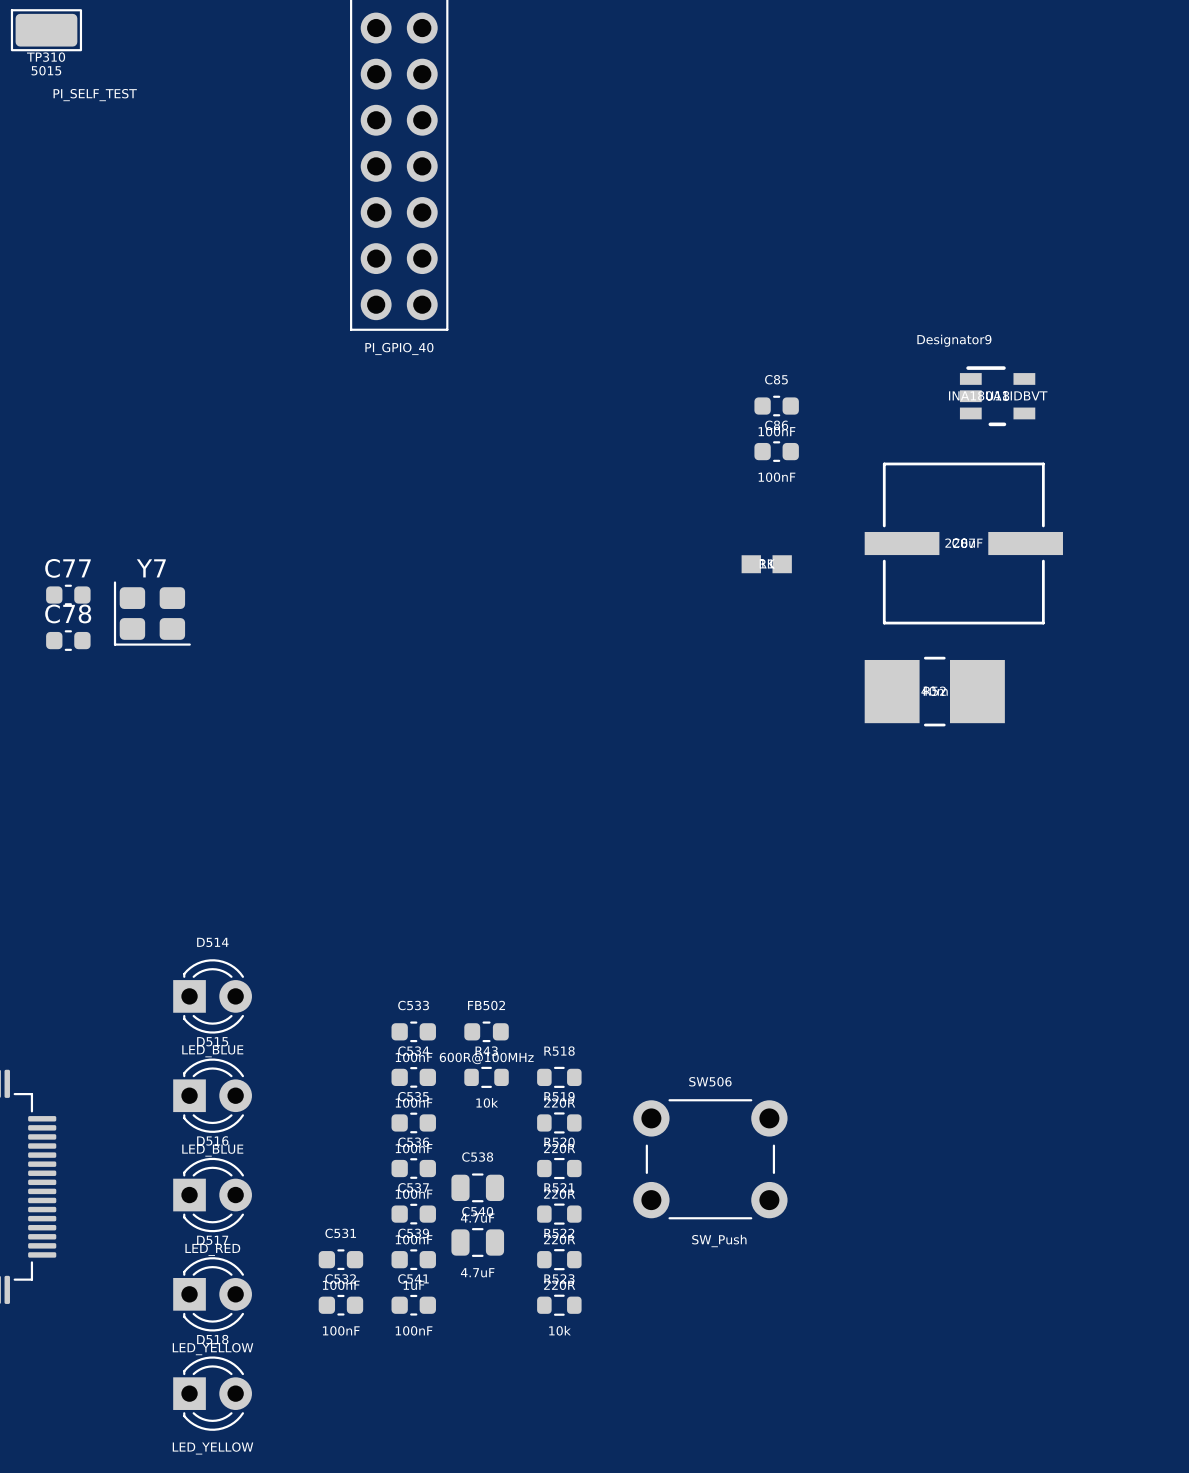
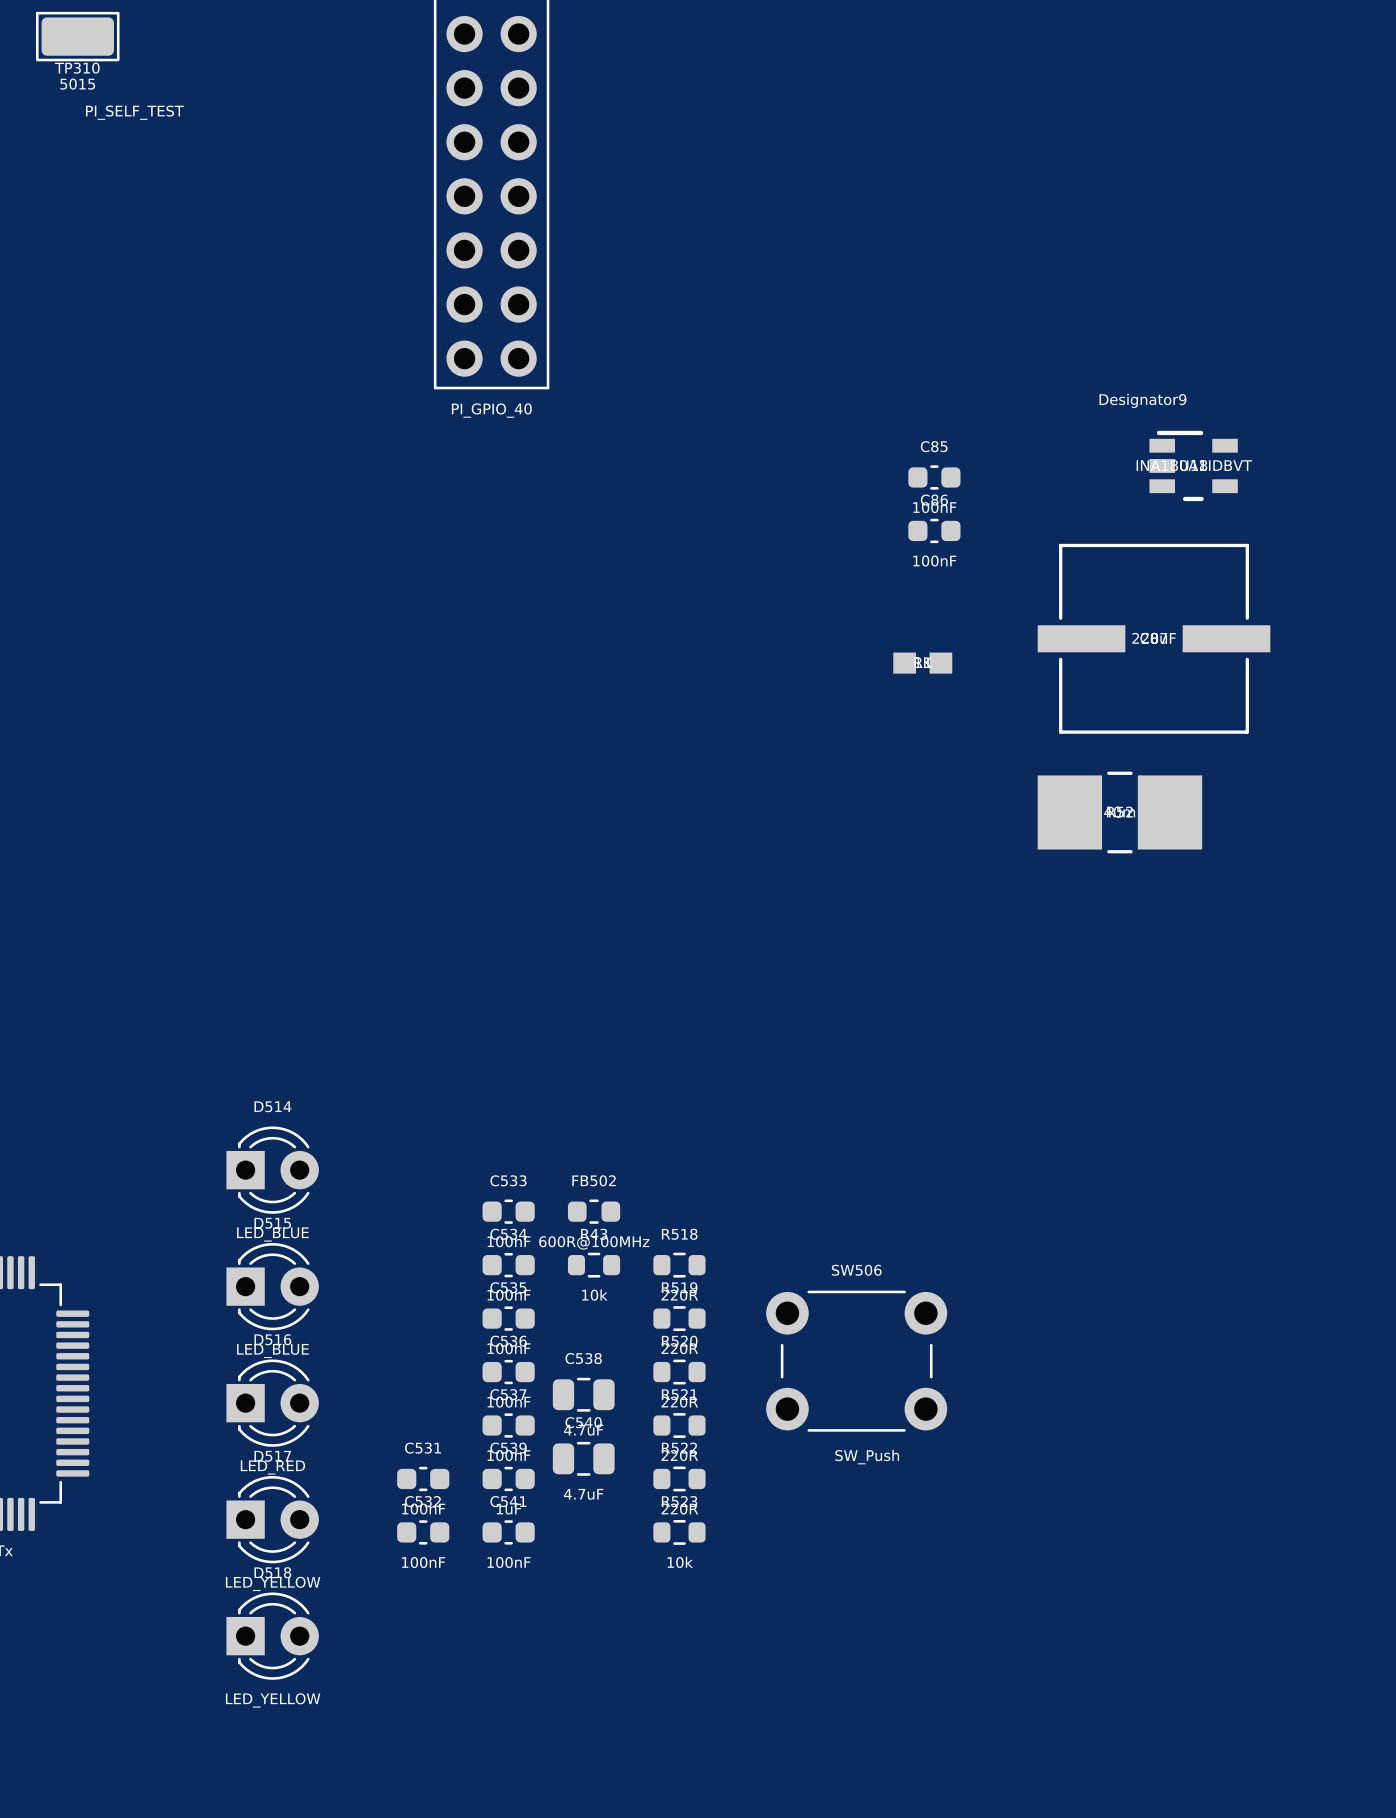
C77: (68, 595) -> none
Y7: (152, 613) -> none
C78: (68, 640) -> none

